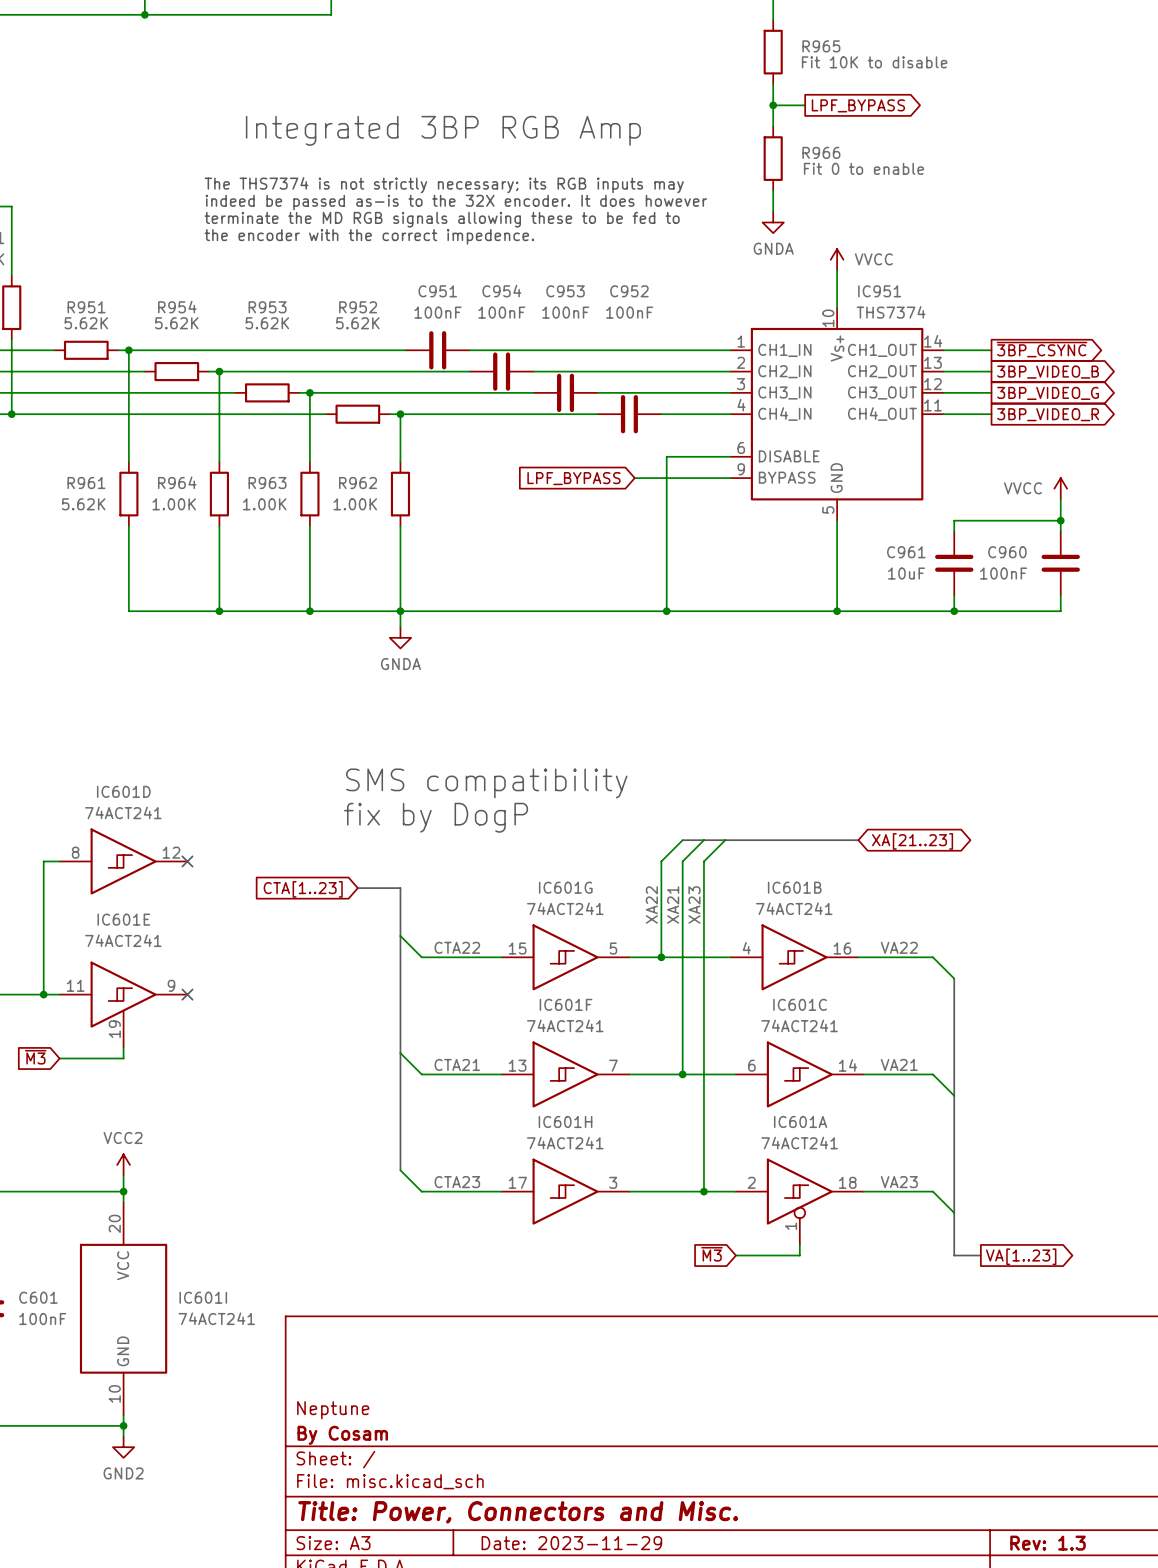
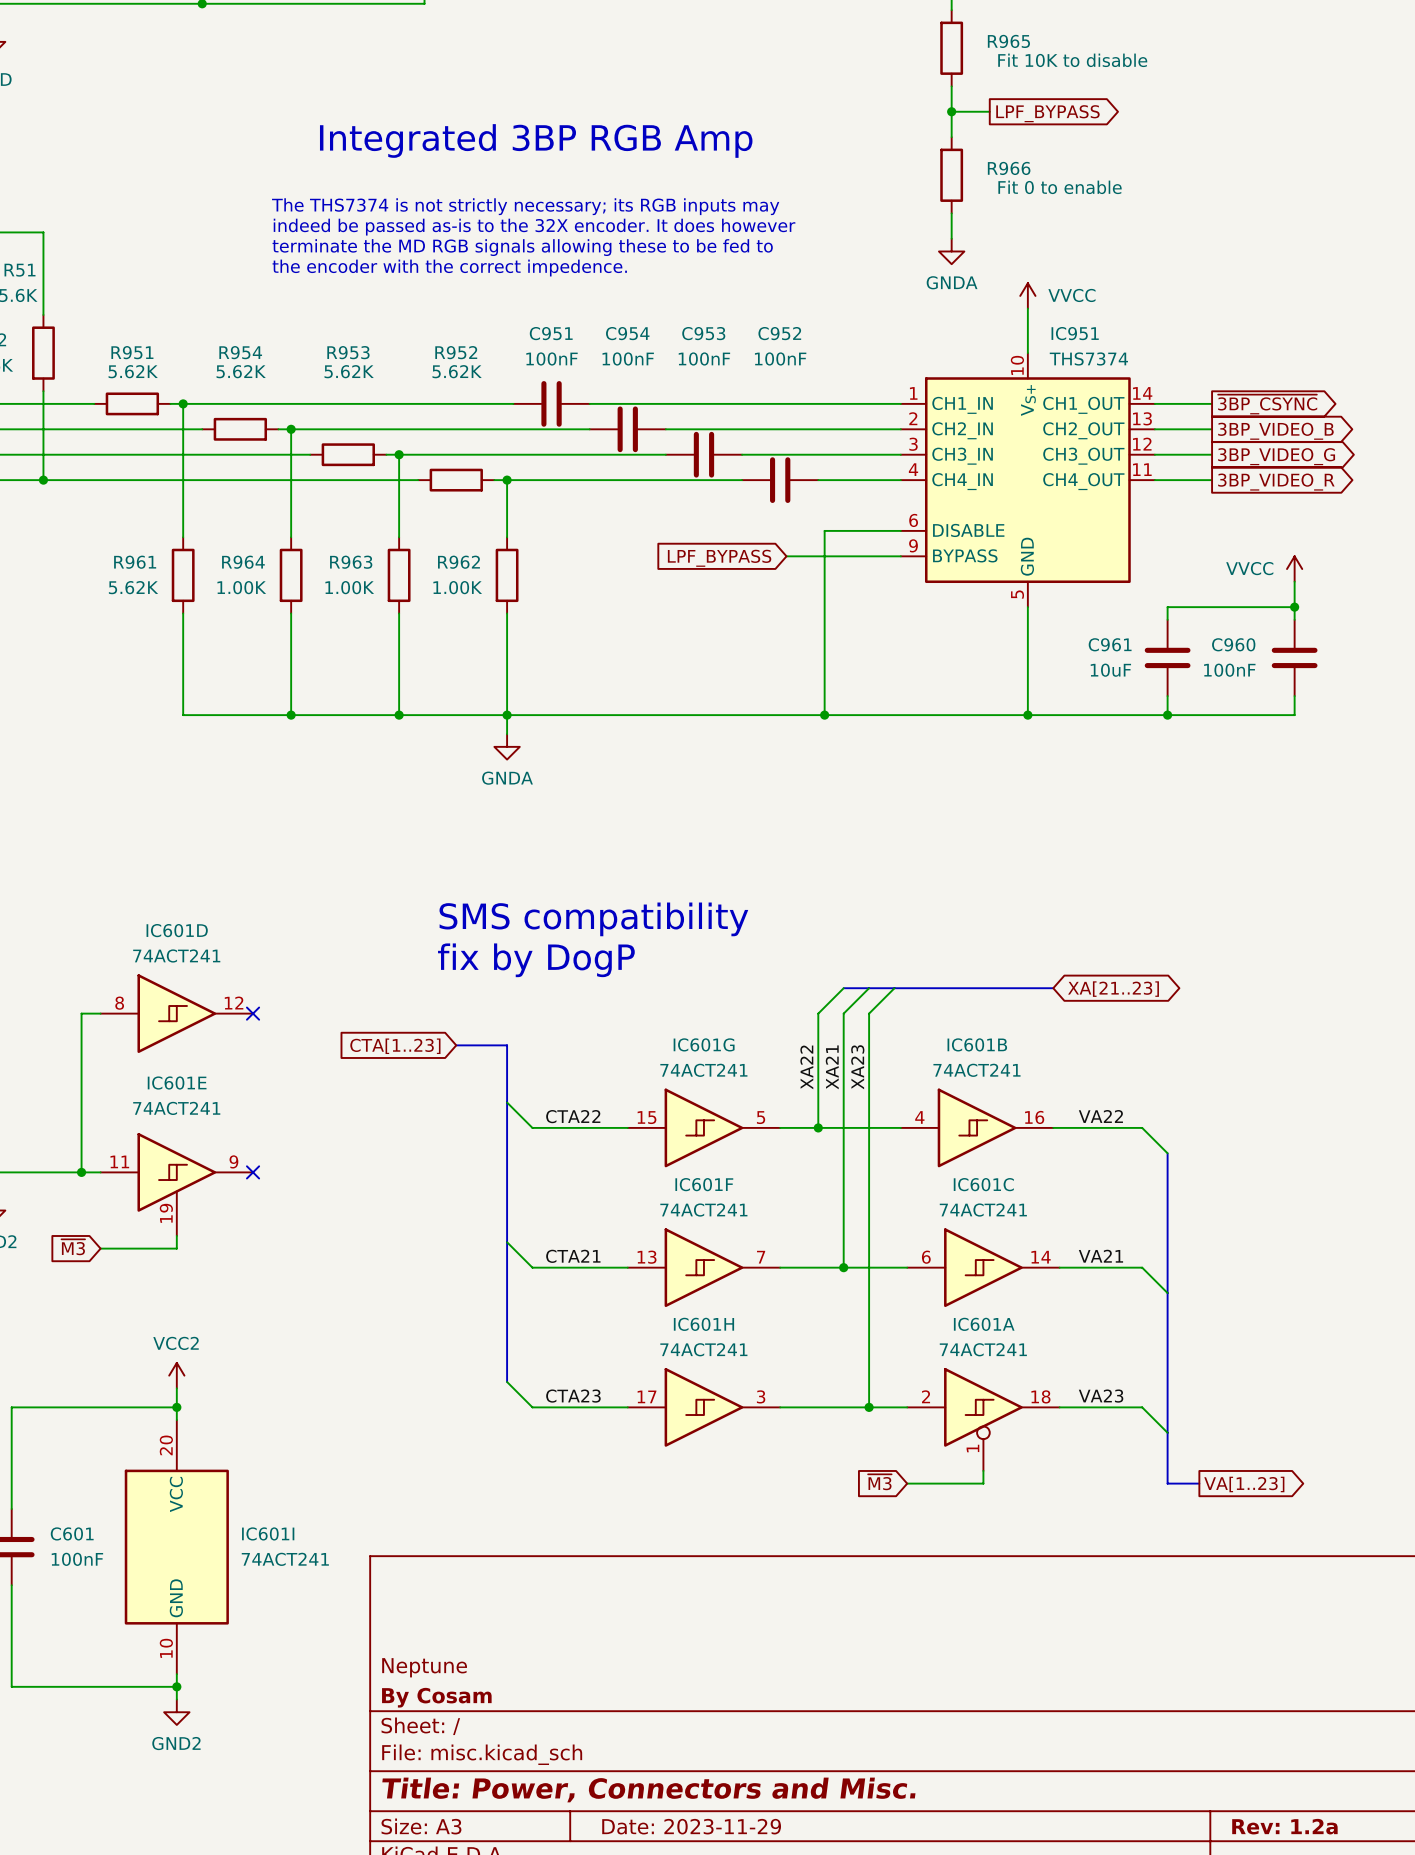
title block: Rev: 1.3 (1048, 1543) -> Rev: 1.2a (1284, 1826)

